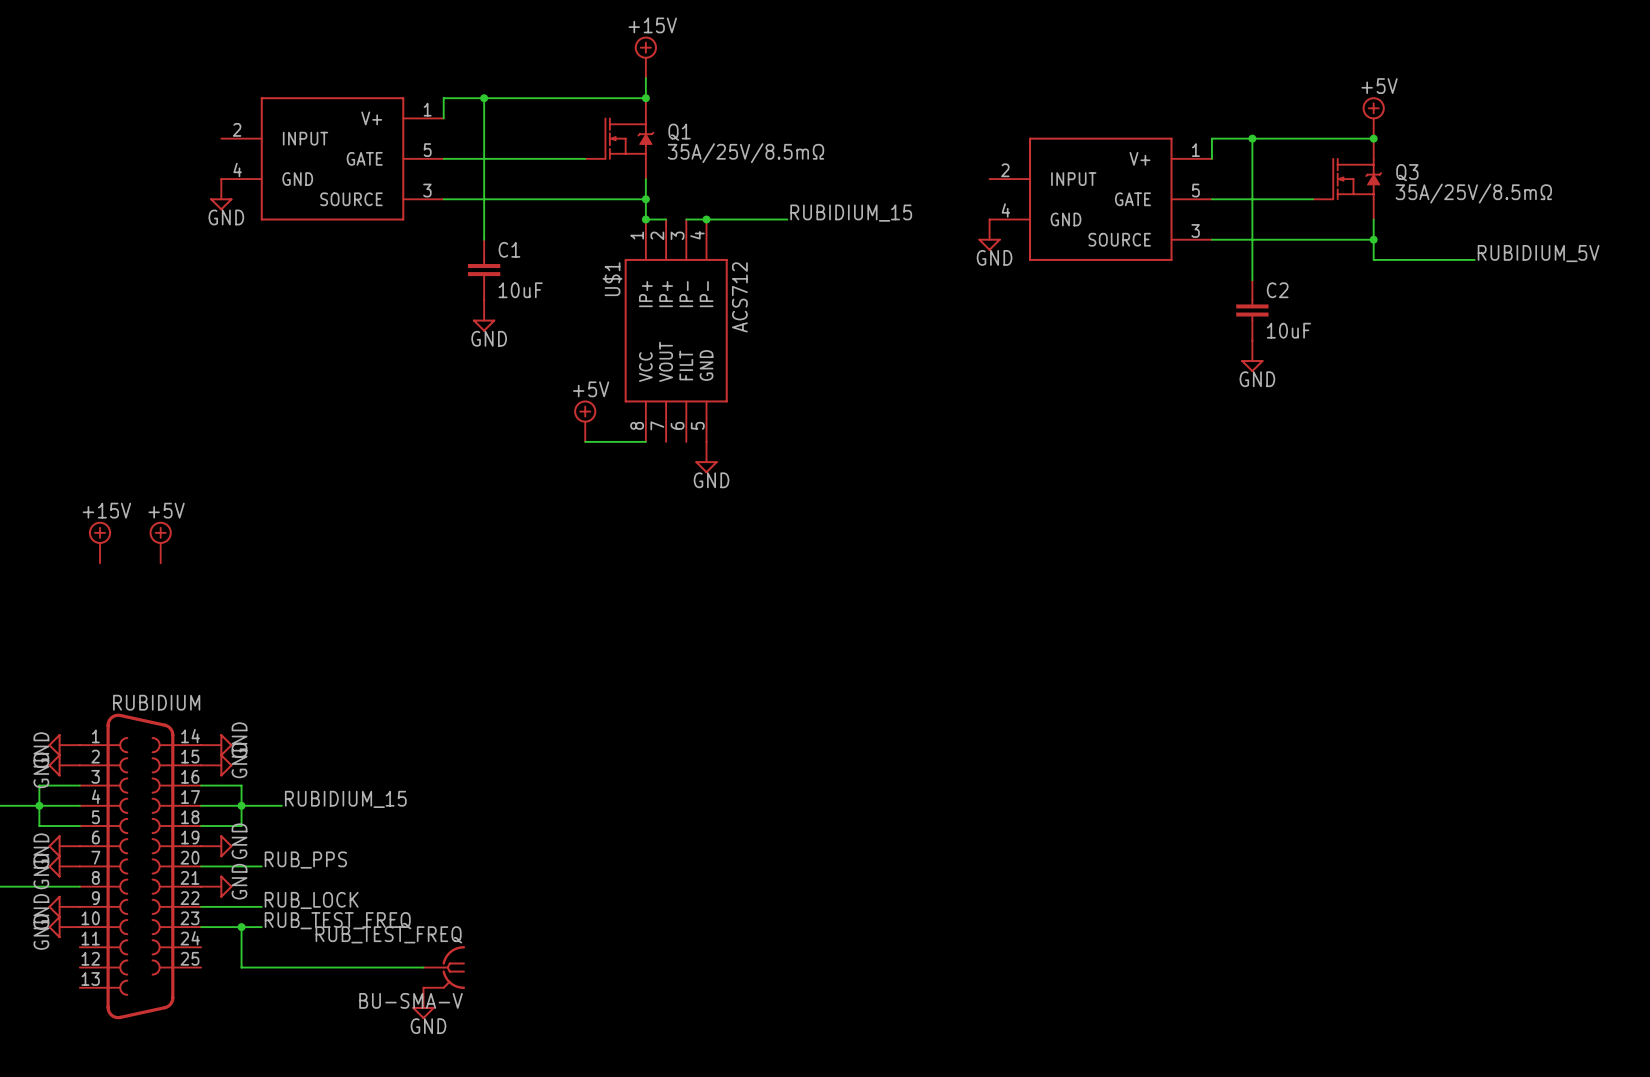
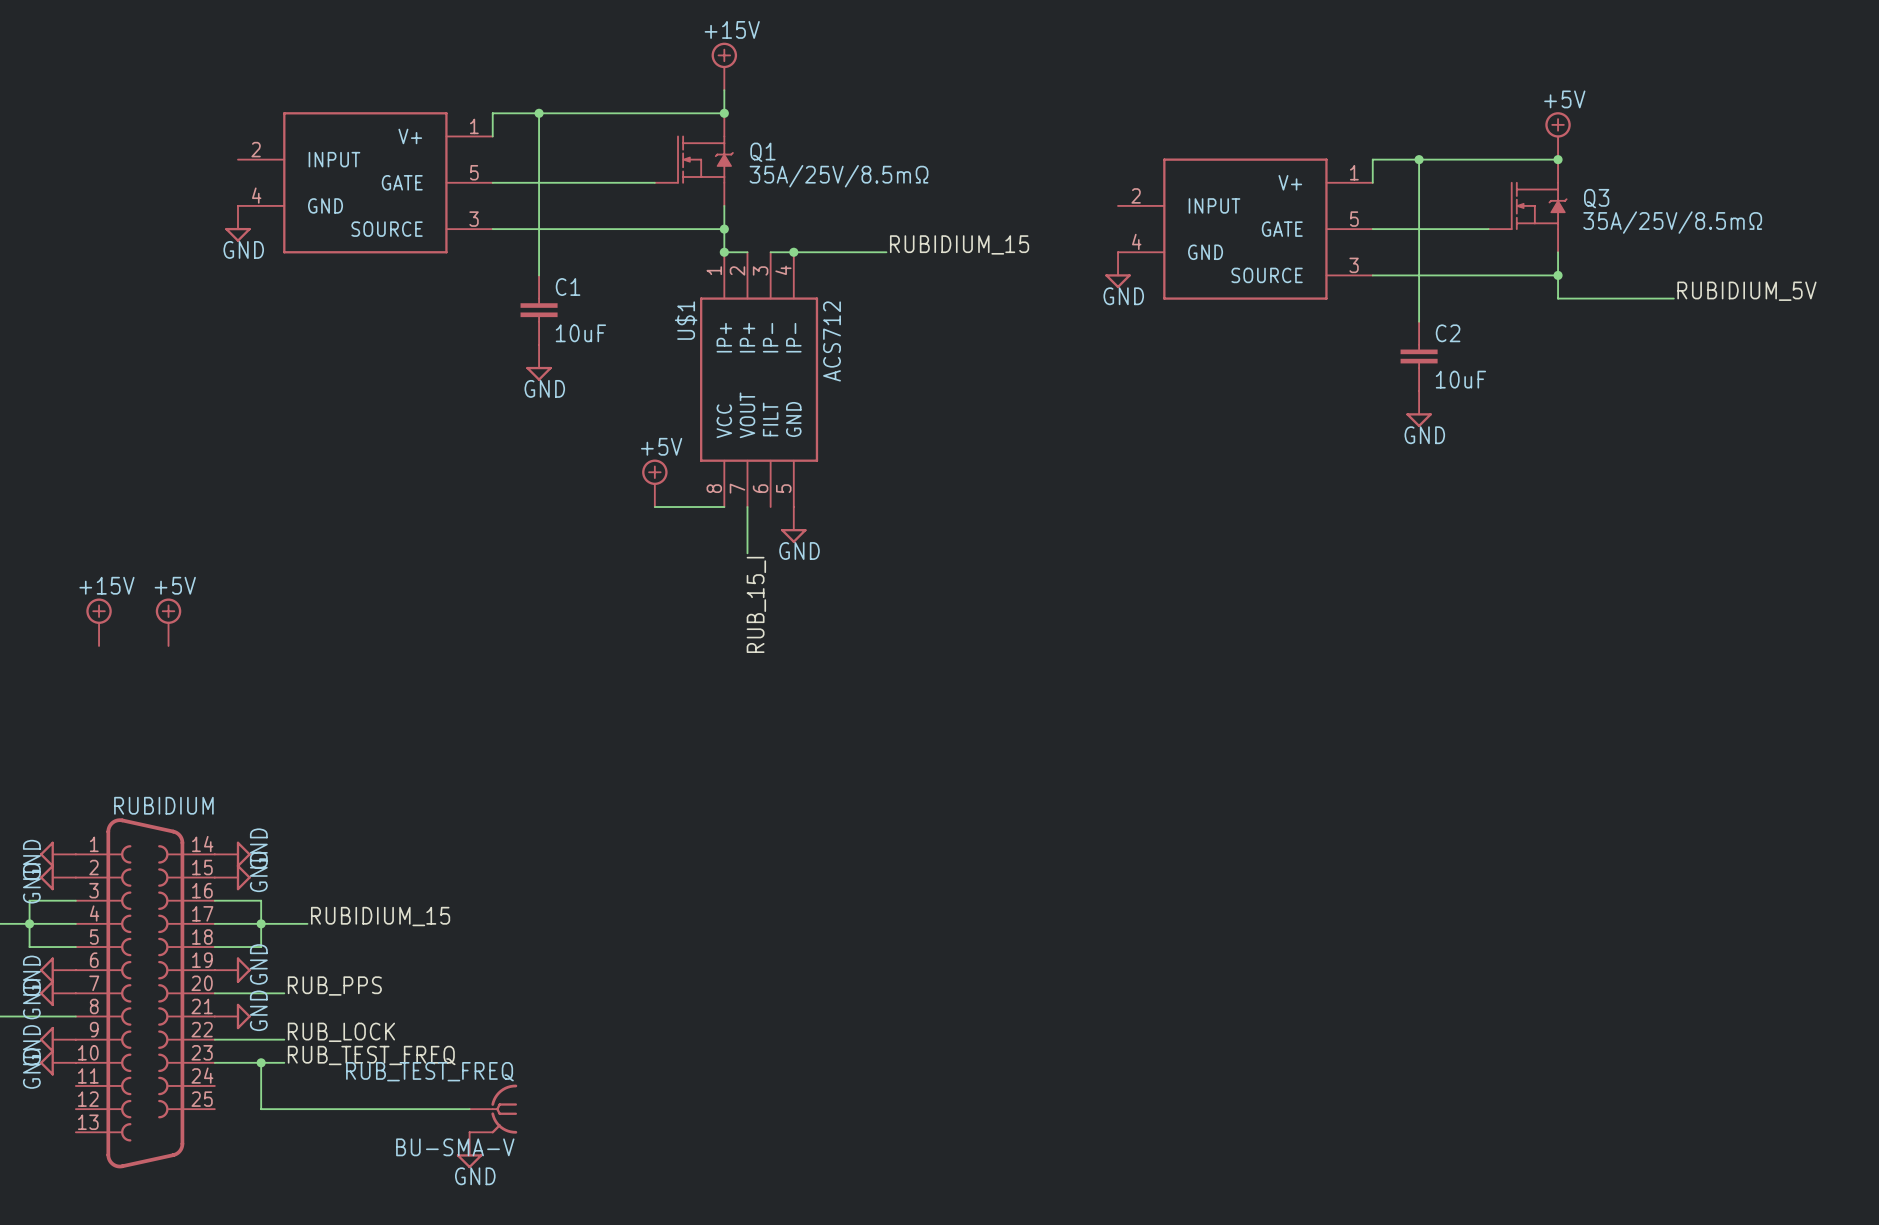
wire: none -> (747, 507) (747, 553)
label: none -> RUB_15_I (756, 604)

